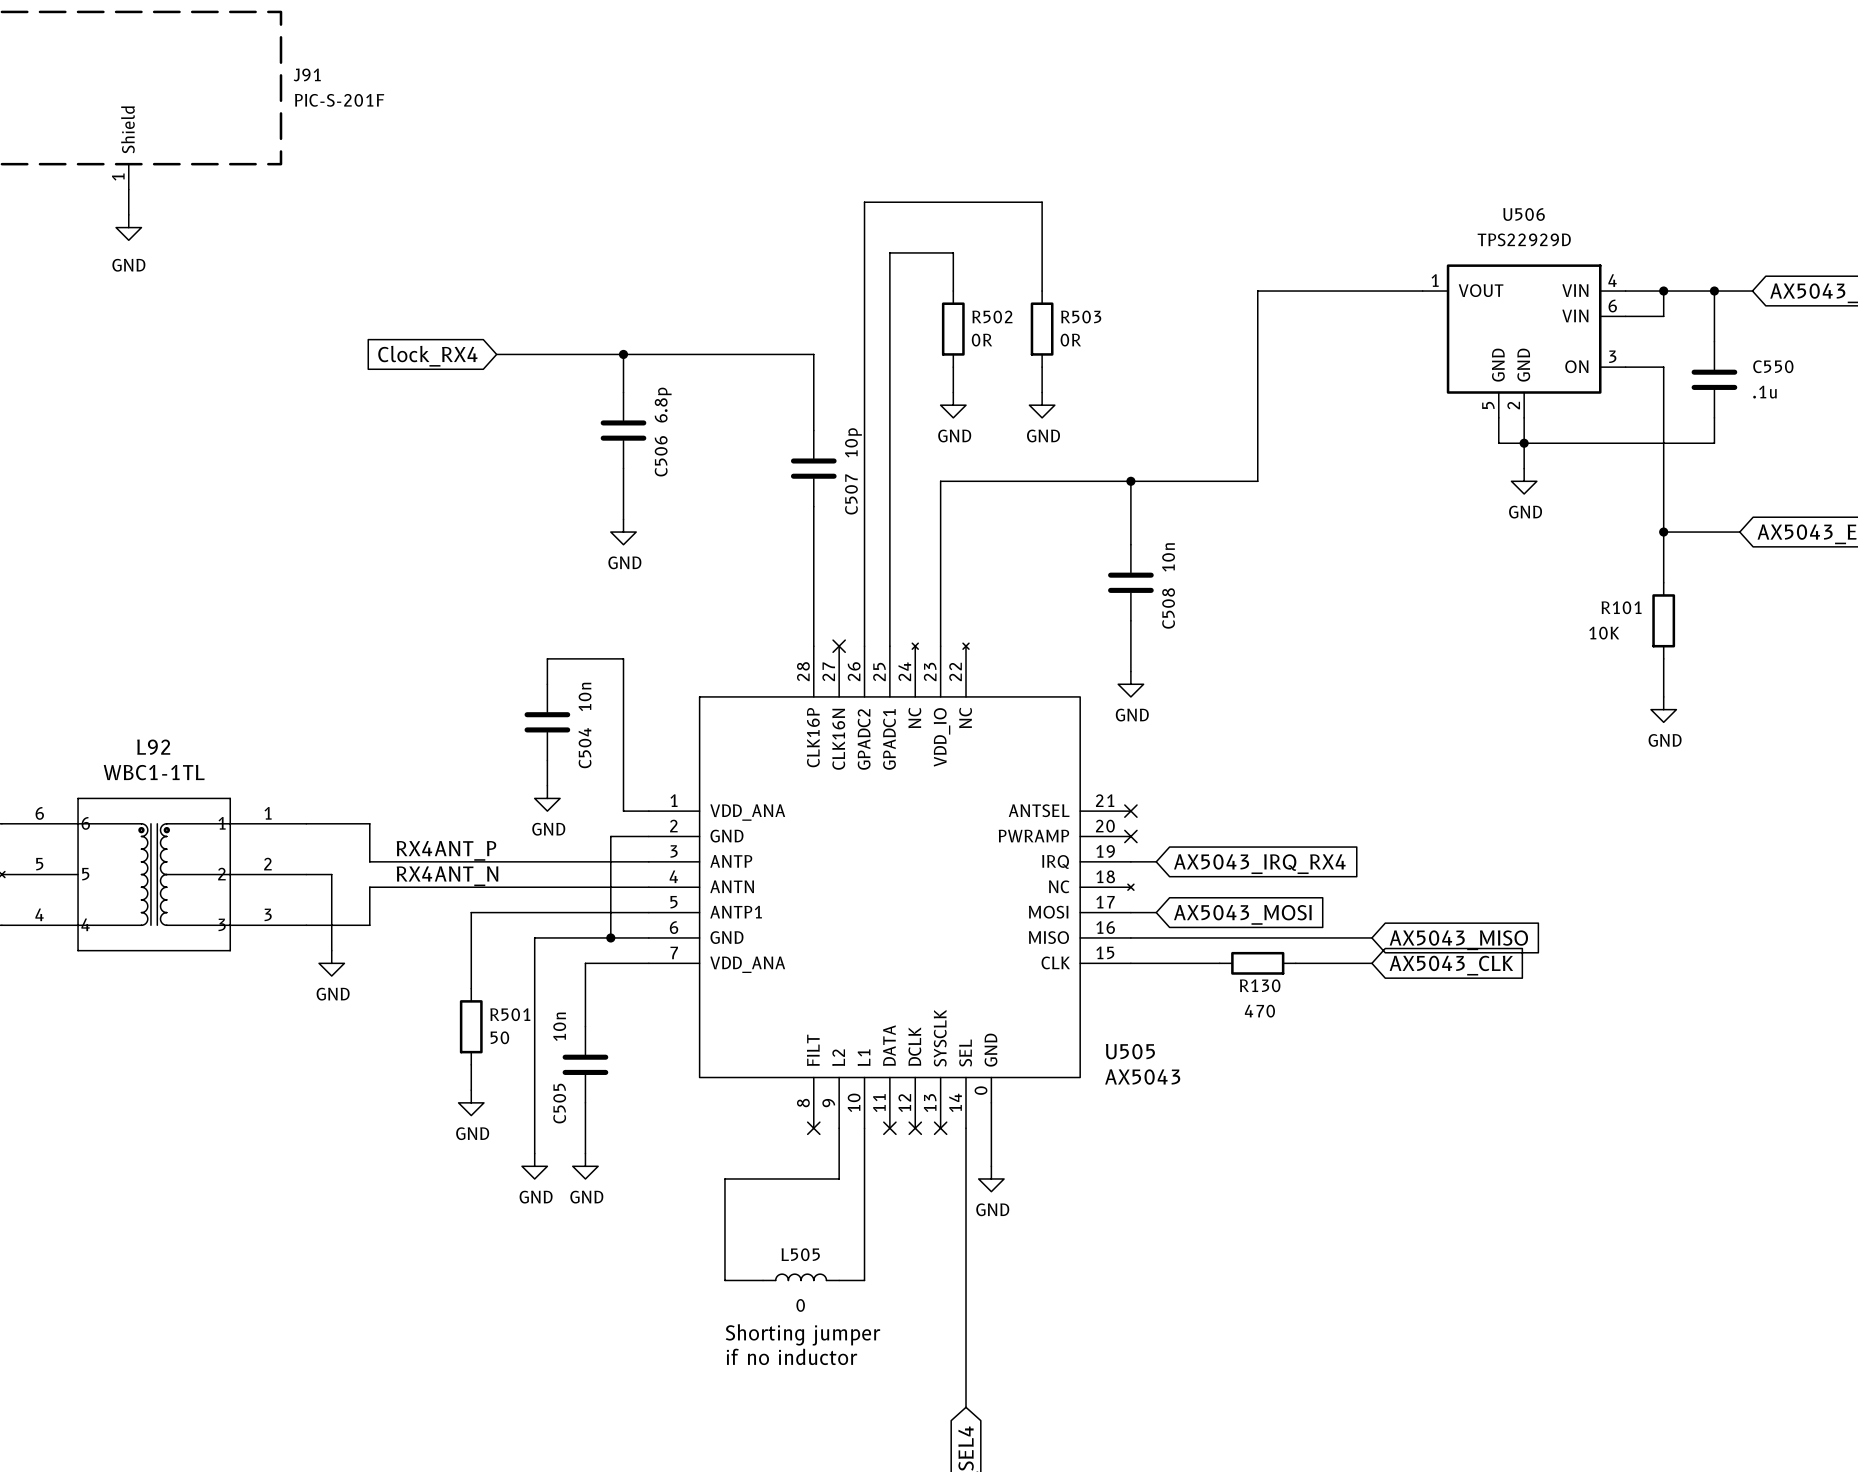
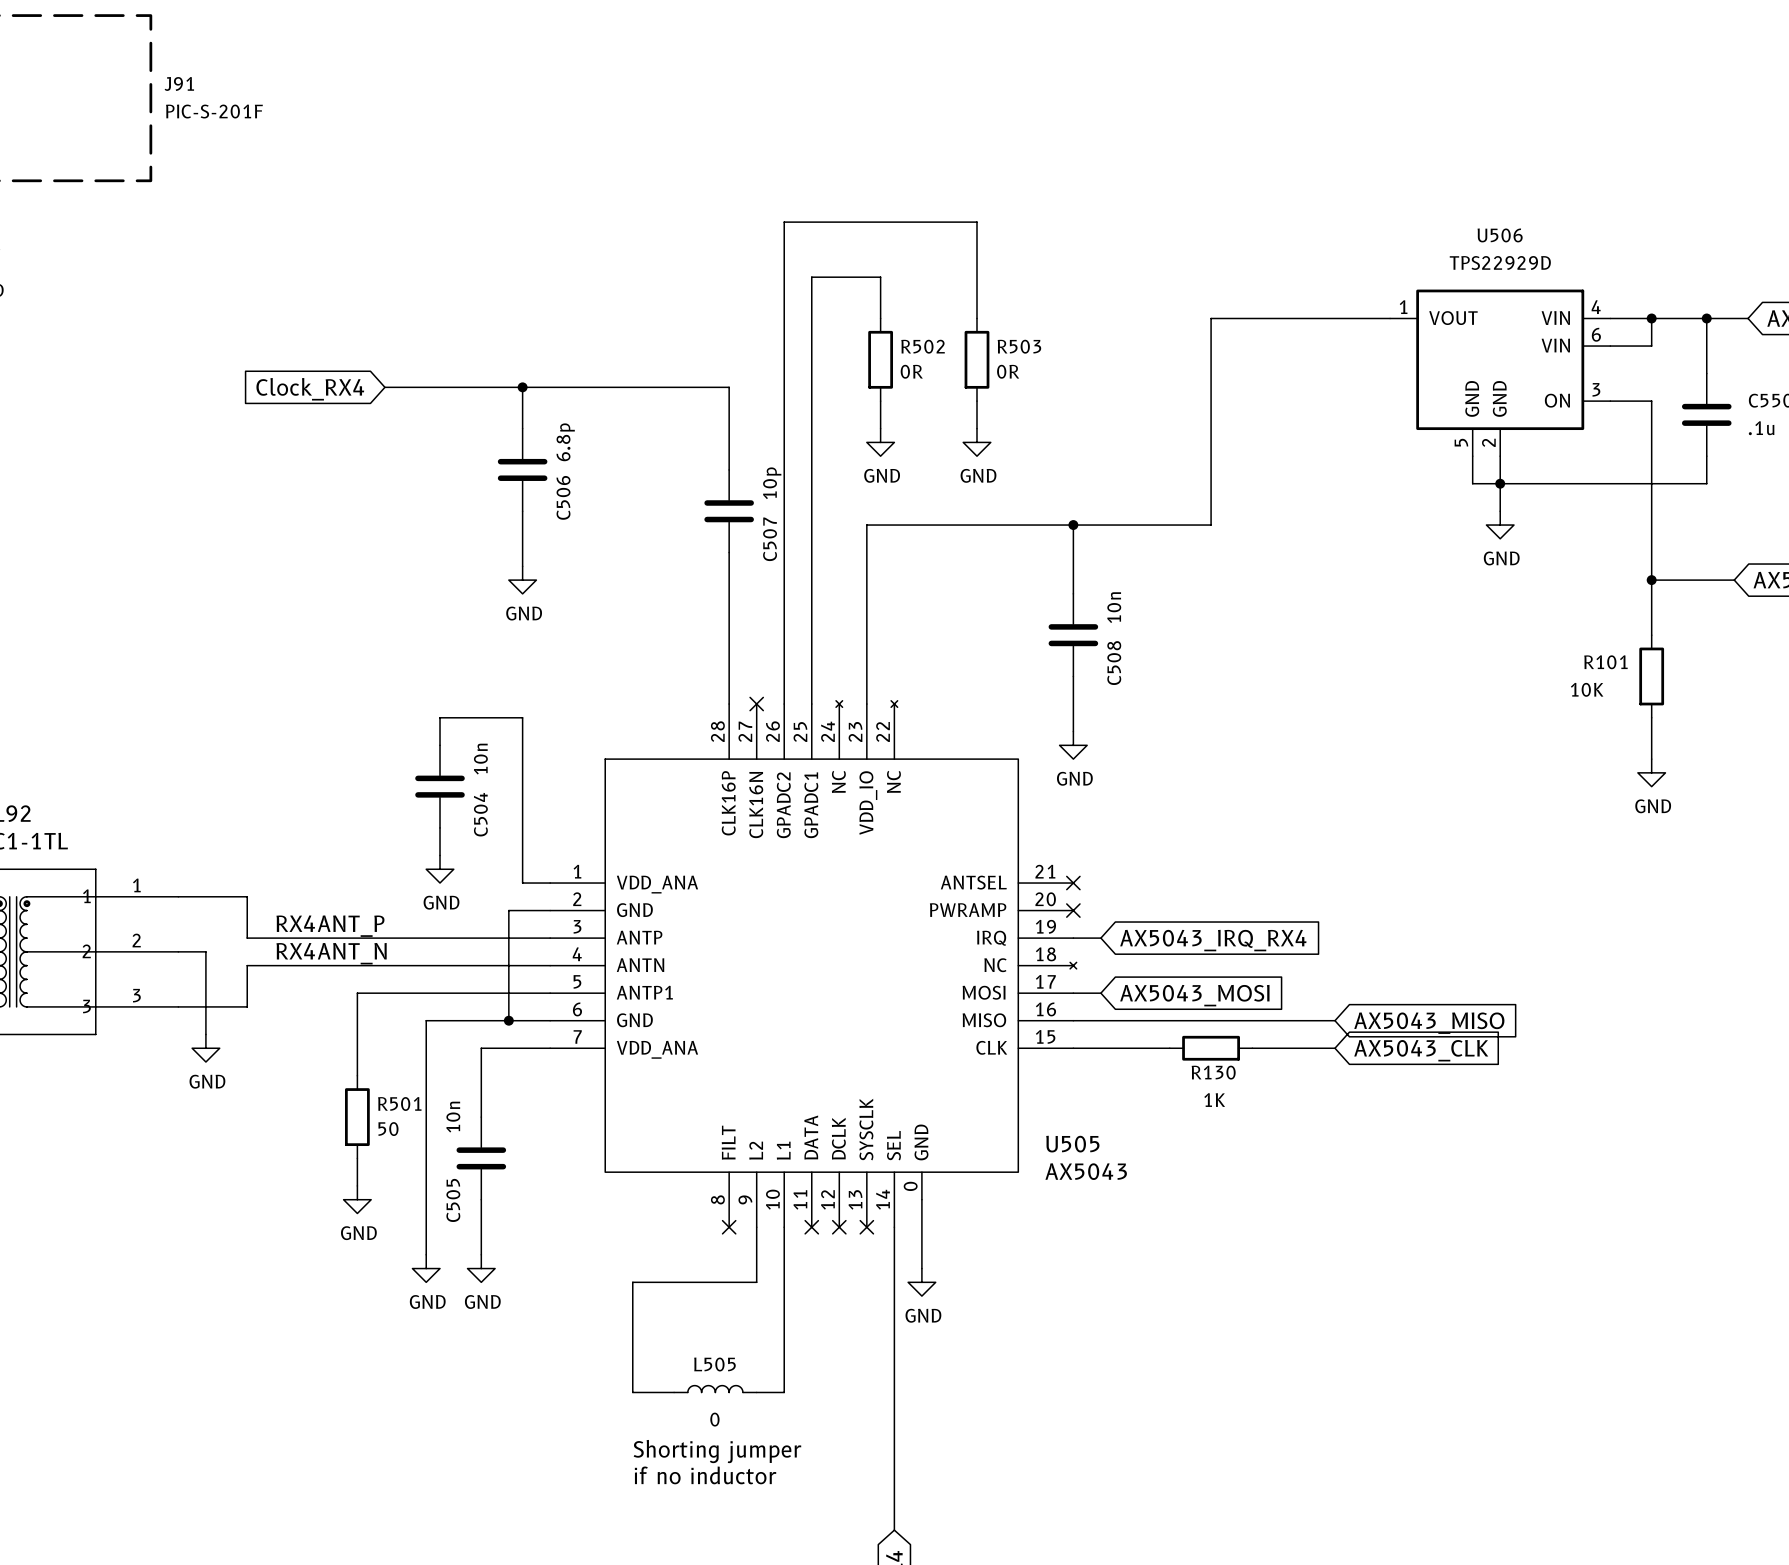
R130 value: 470 (1259, 1011) -> 1K (1214, 1100)

